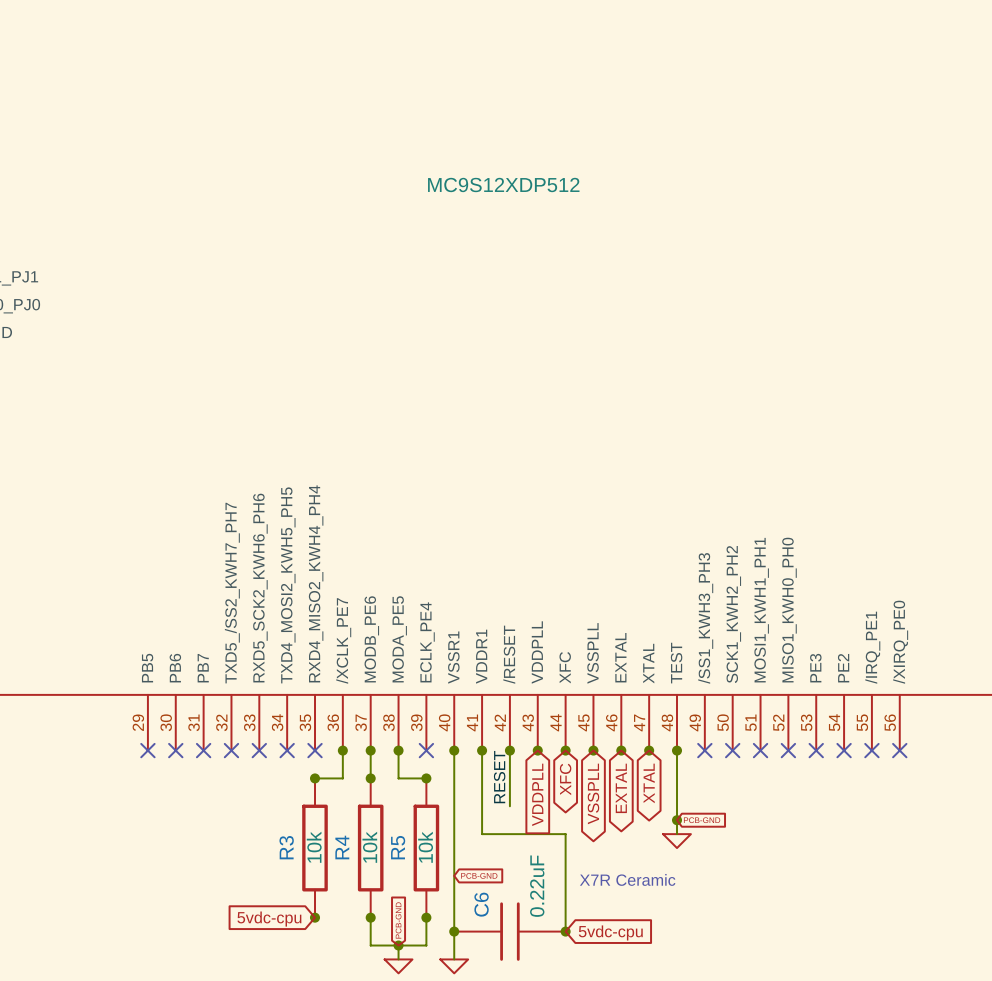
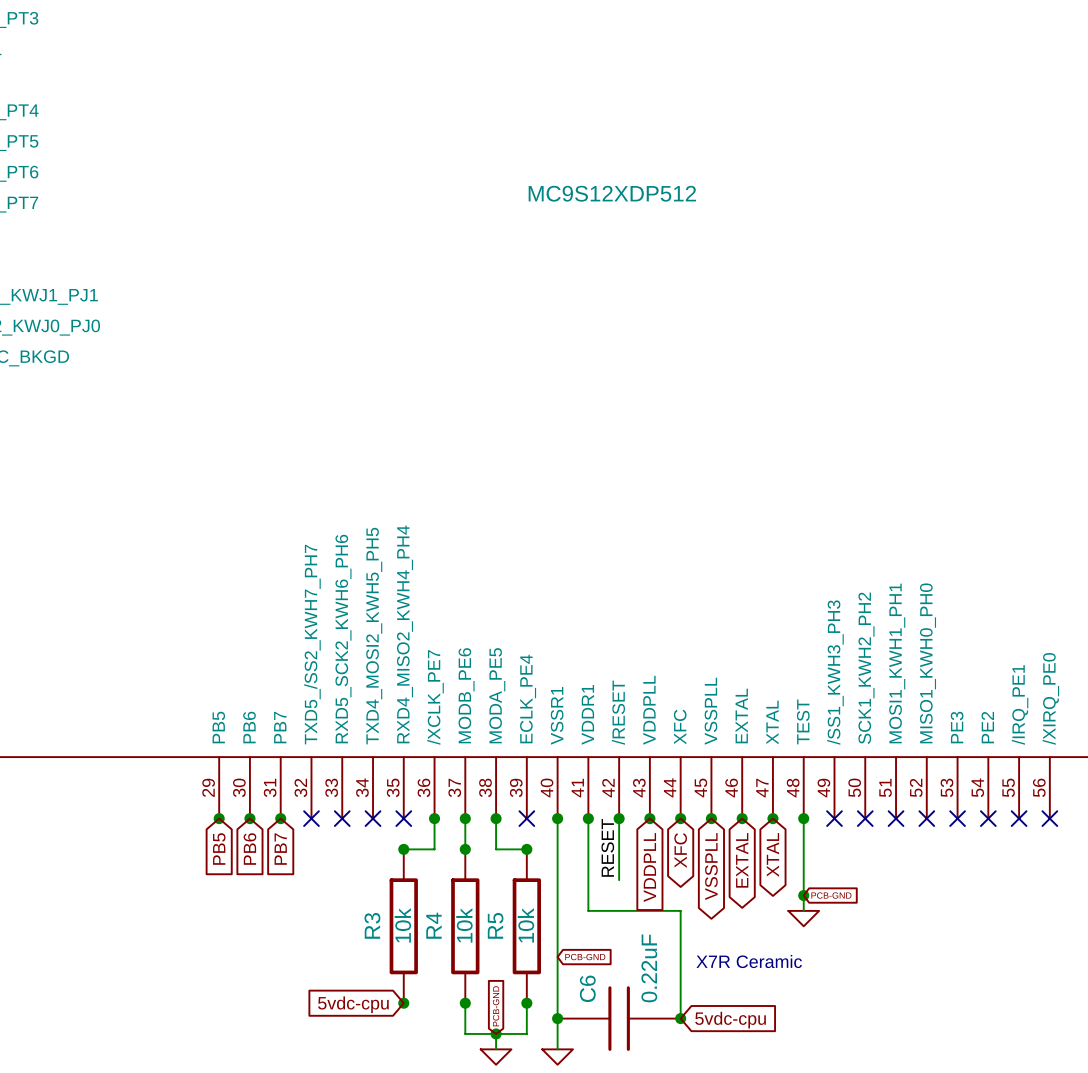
no-connect mark: (147, 750) -> none
junction: none -> (219, 818)
no-connect mark: (175, 750) -> none
junction: none -> (249, 818)
no-connect mark: (203, 750) -> none
junction: none -> (280, 818)
global label: none -> PB5 (219, 849)
global label: none -> PB6 (249, 849)
global label: none -> PB7 (280, 849)

